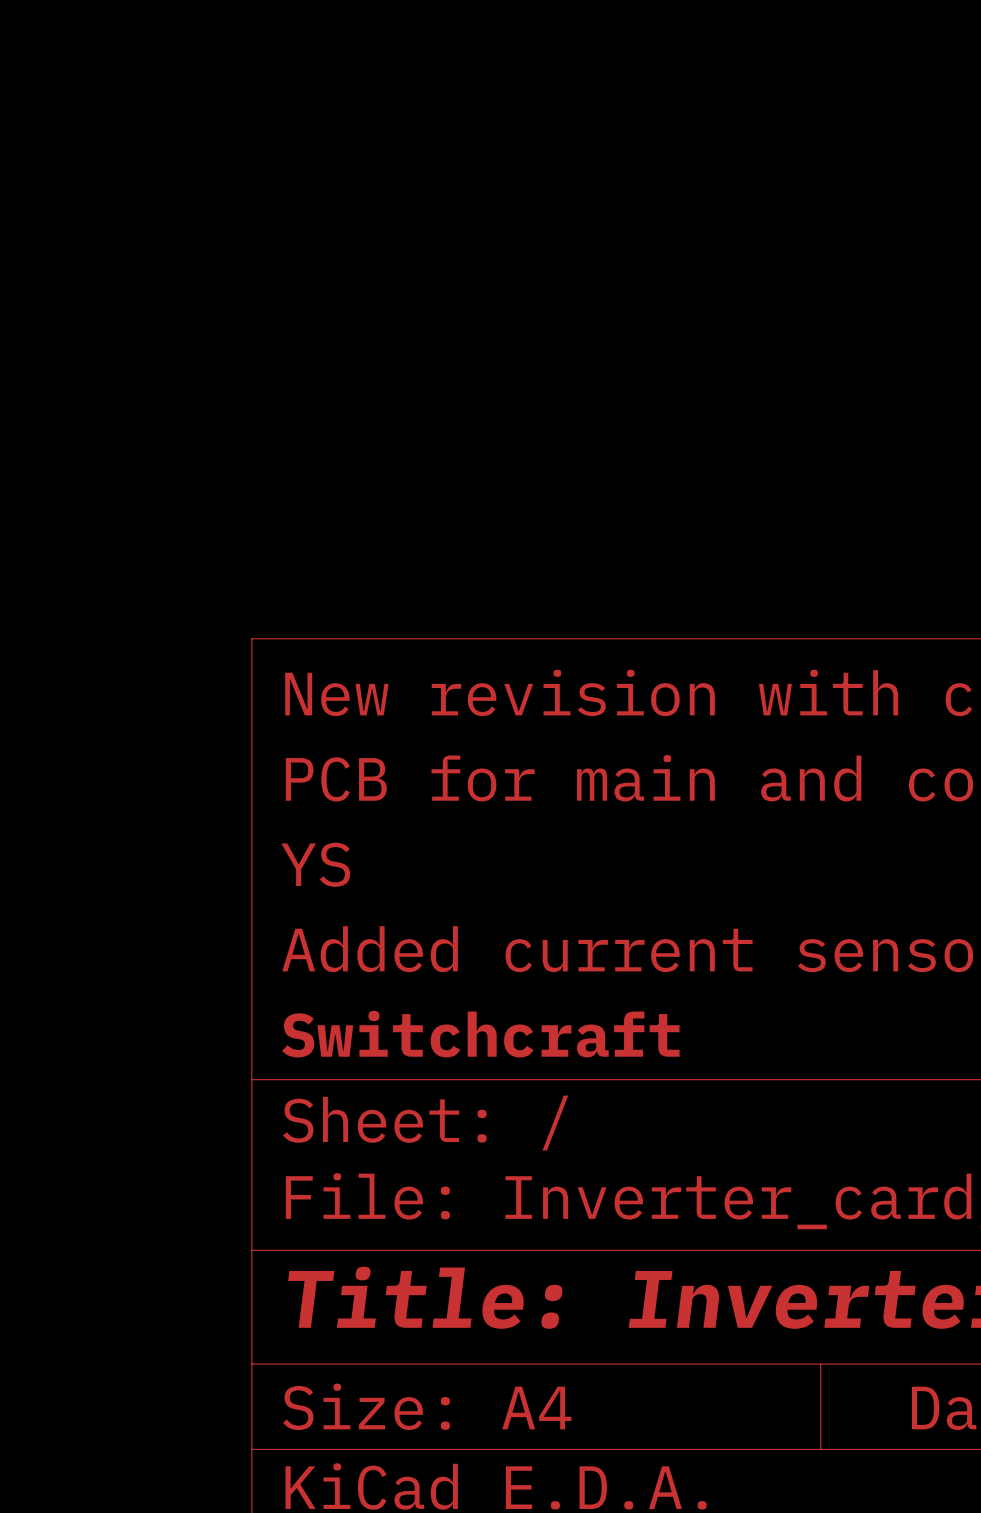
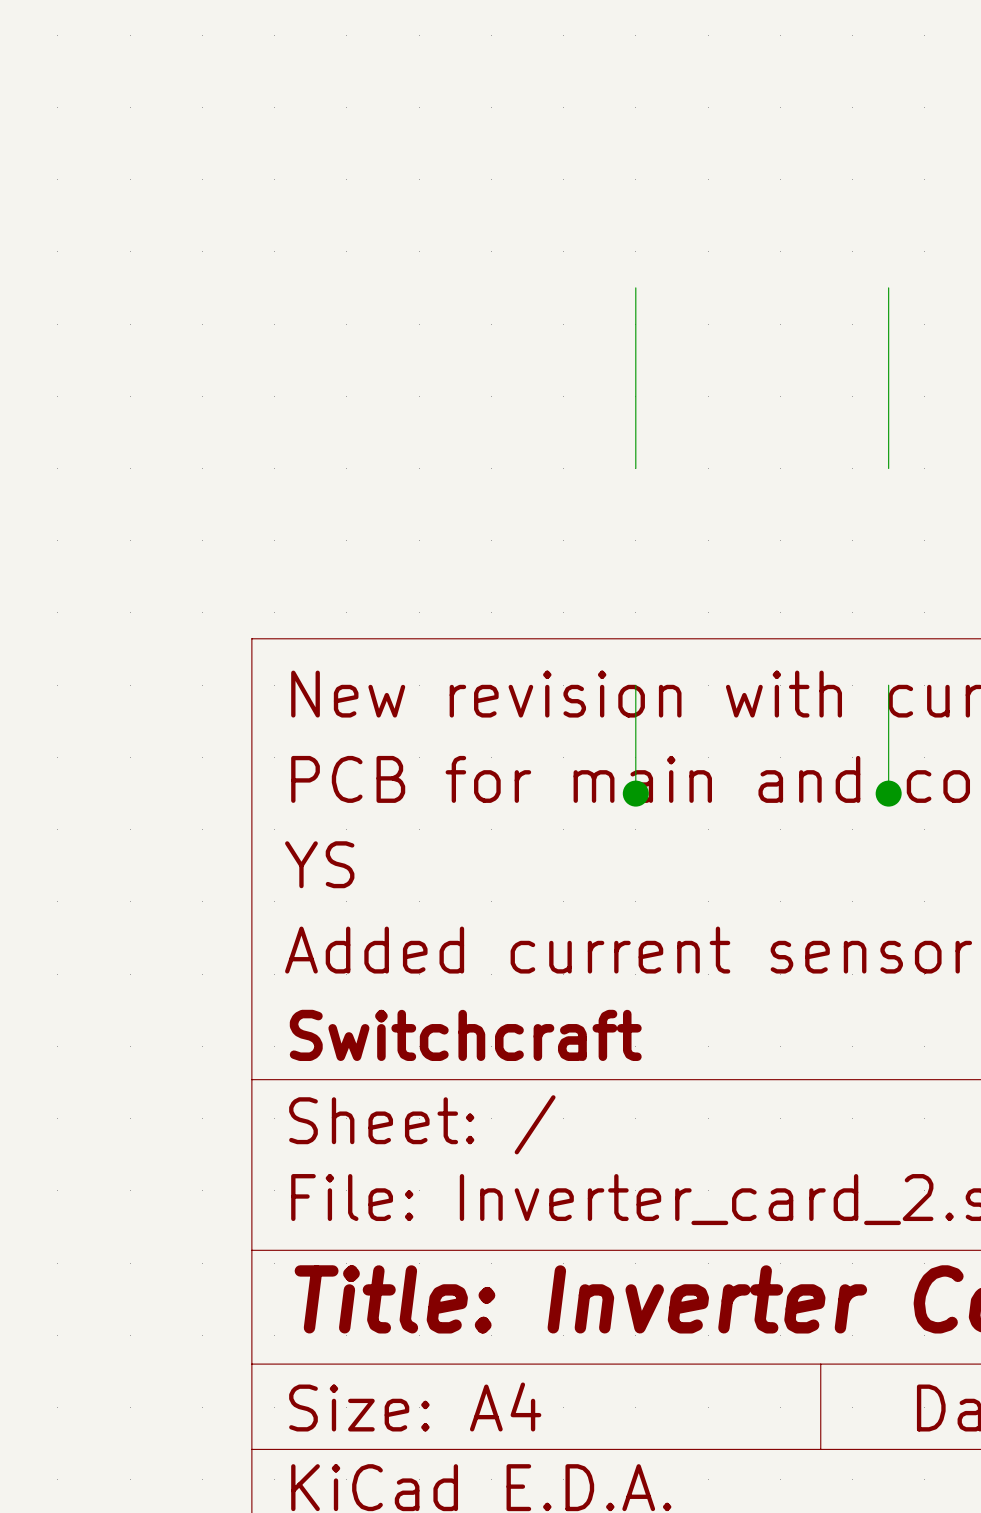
wire: none -> (635, 287) (635, 468)
wire: none -> (888, 287) (888, 468)
wire: none -> (635, 685) (635, 793)
wire: none -> (888, 685) (888, 793)
junction: none -> (635, 793)
junction: none -> (888, 793)

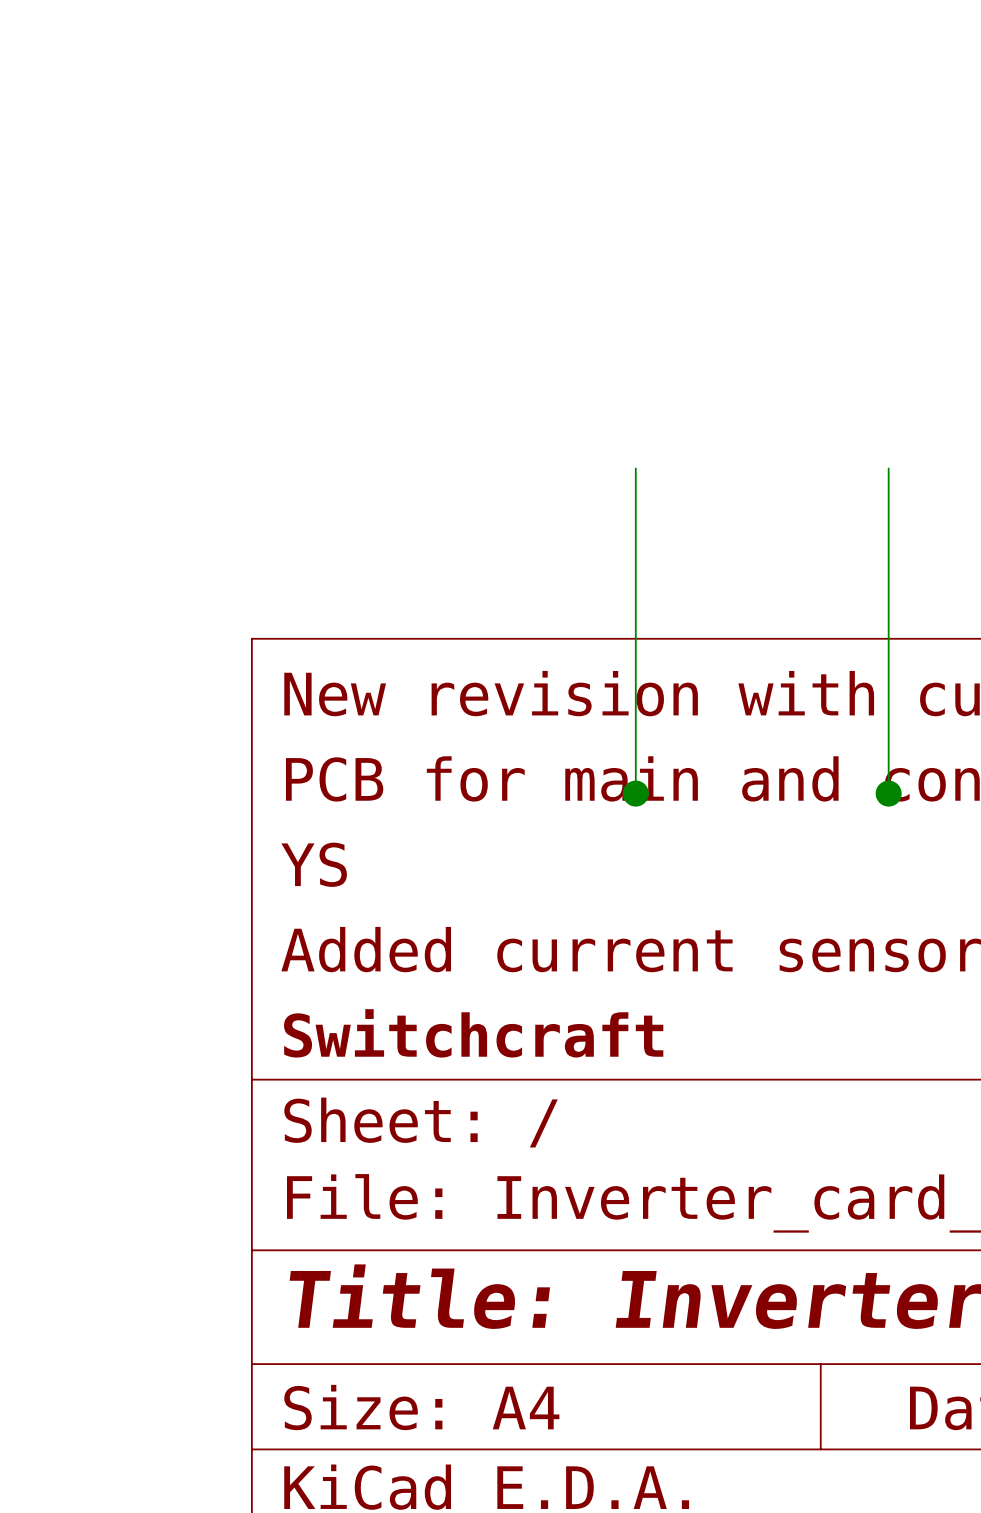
wire: (635, 287) (635, 468) -> (635, 685) (635, 468)
wire: (888, 287) (888, 468) -> (888, 685) (888, 468)

